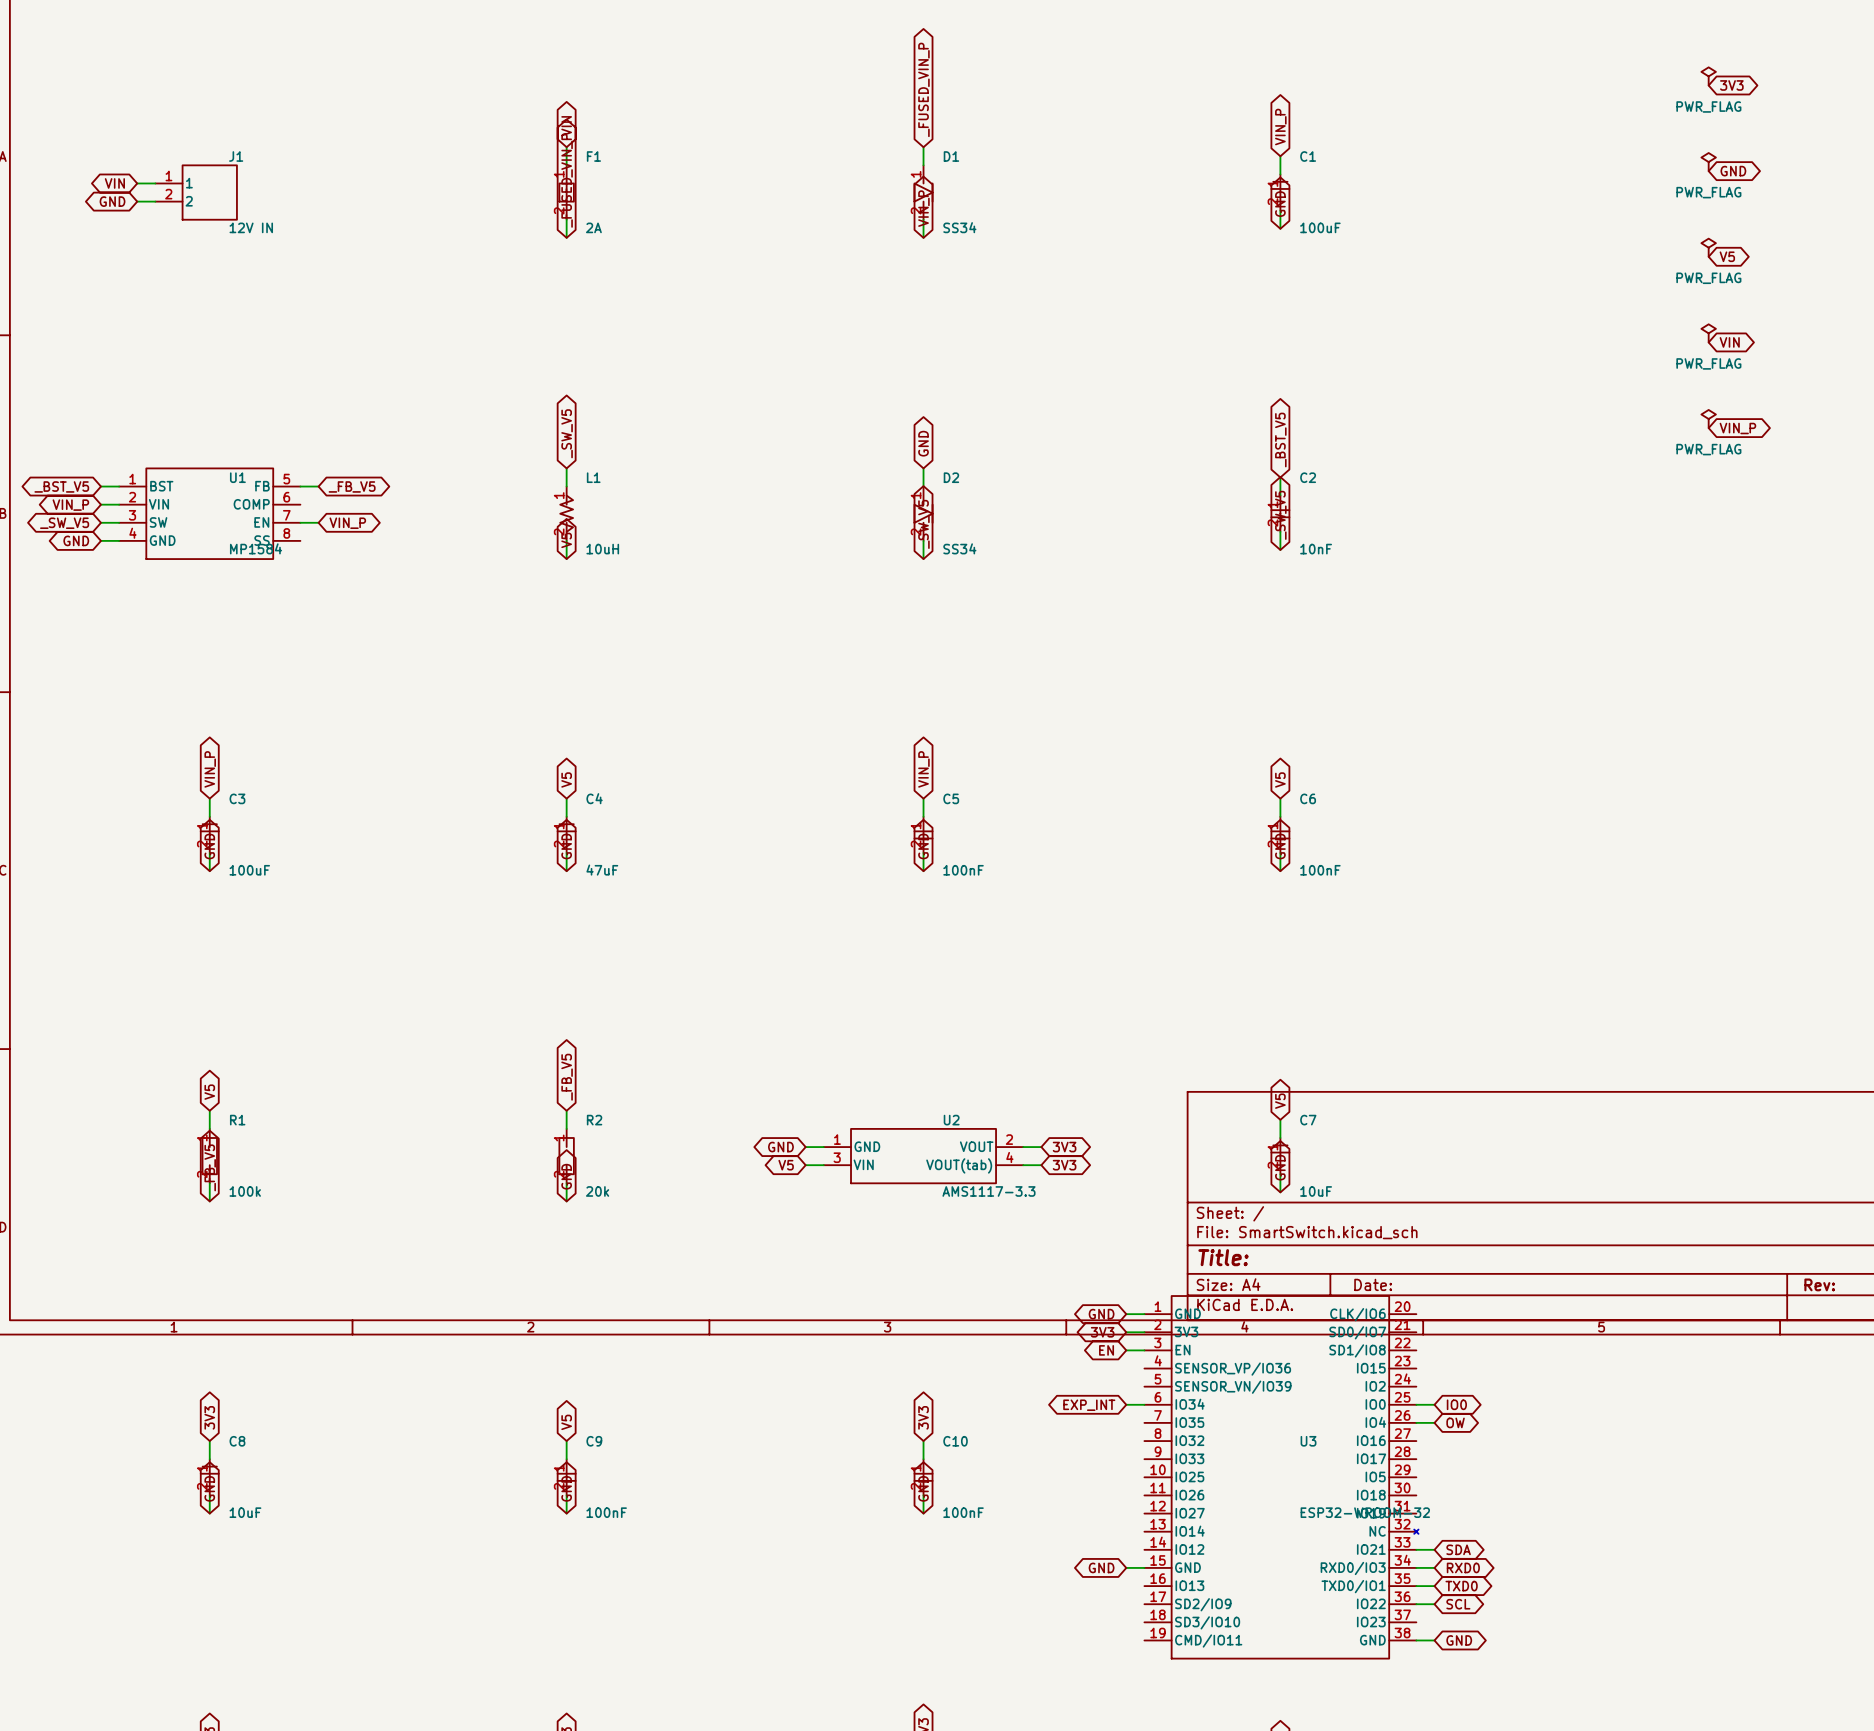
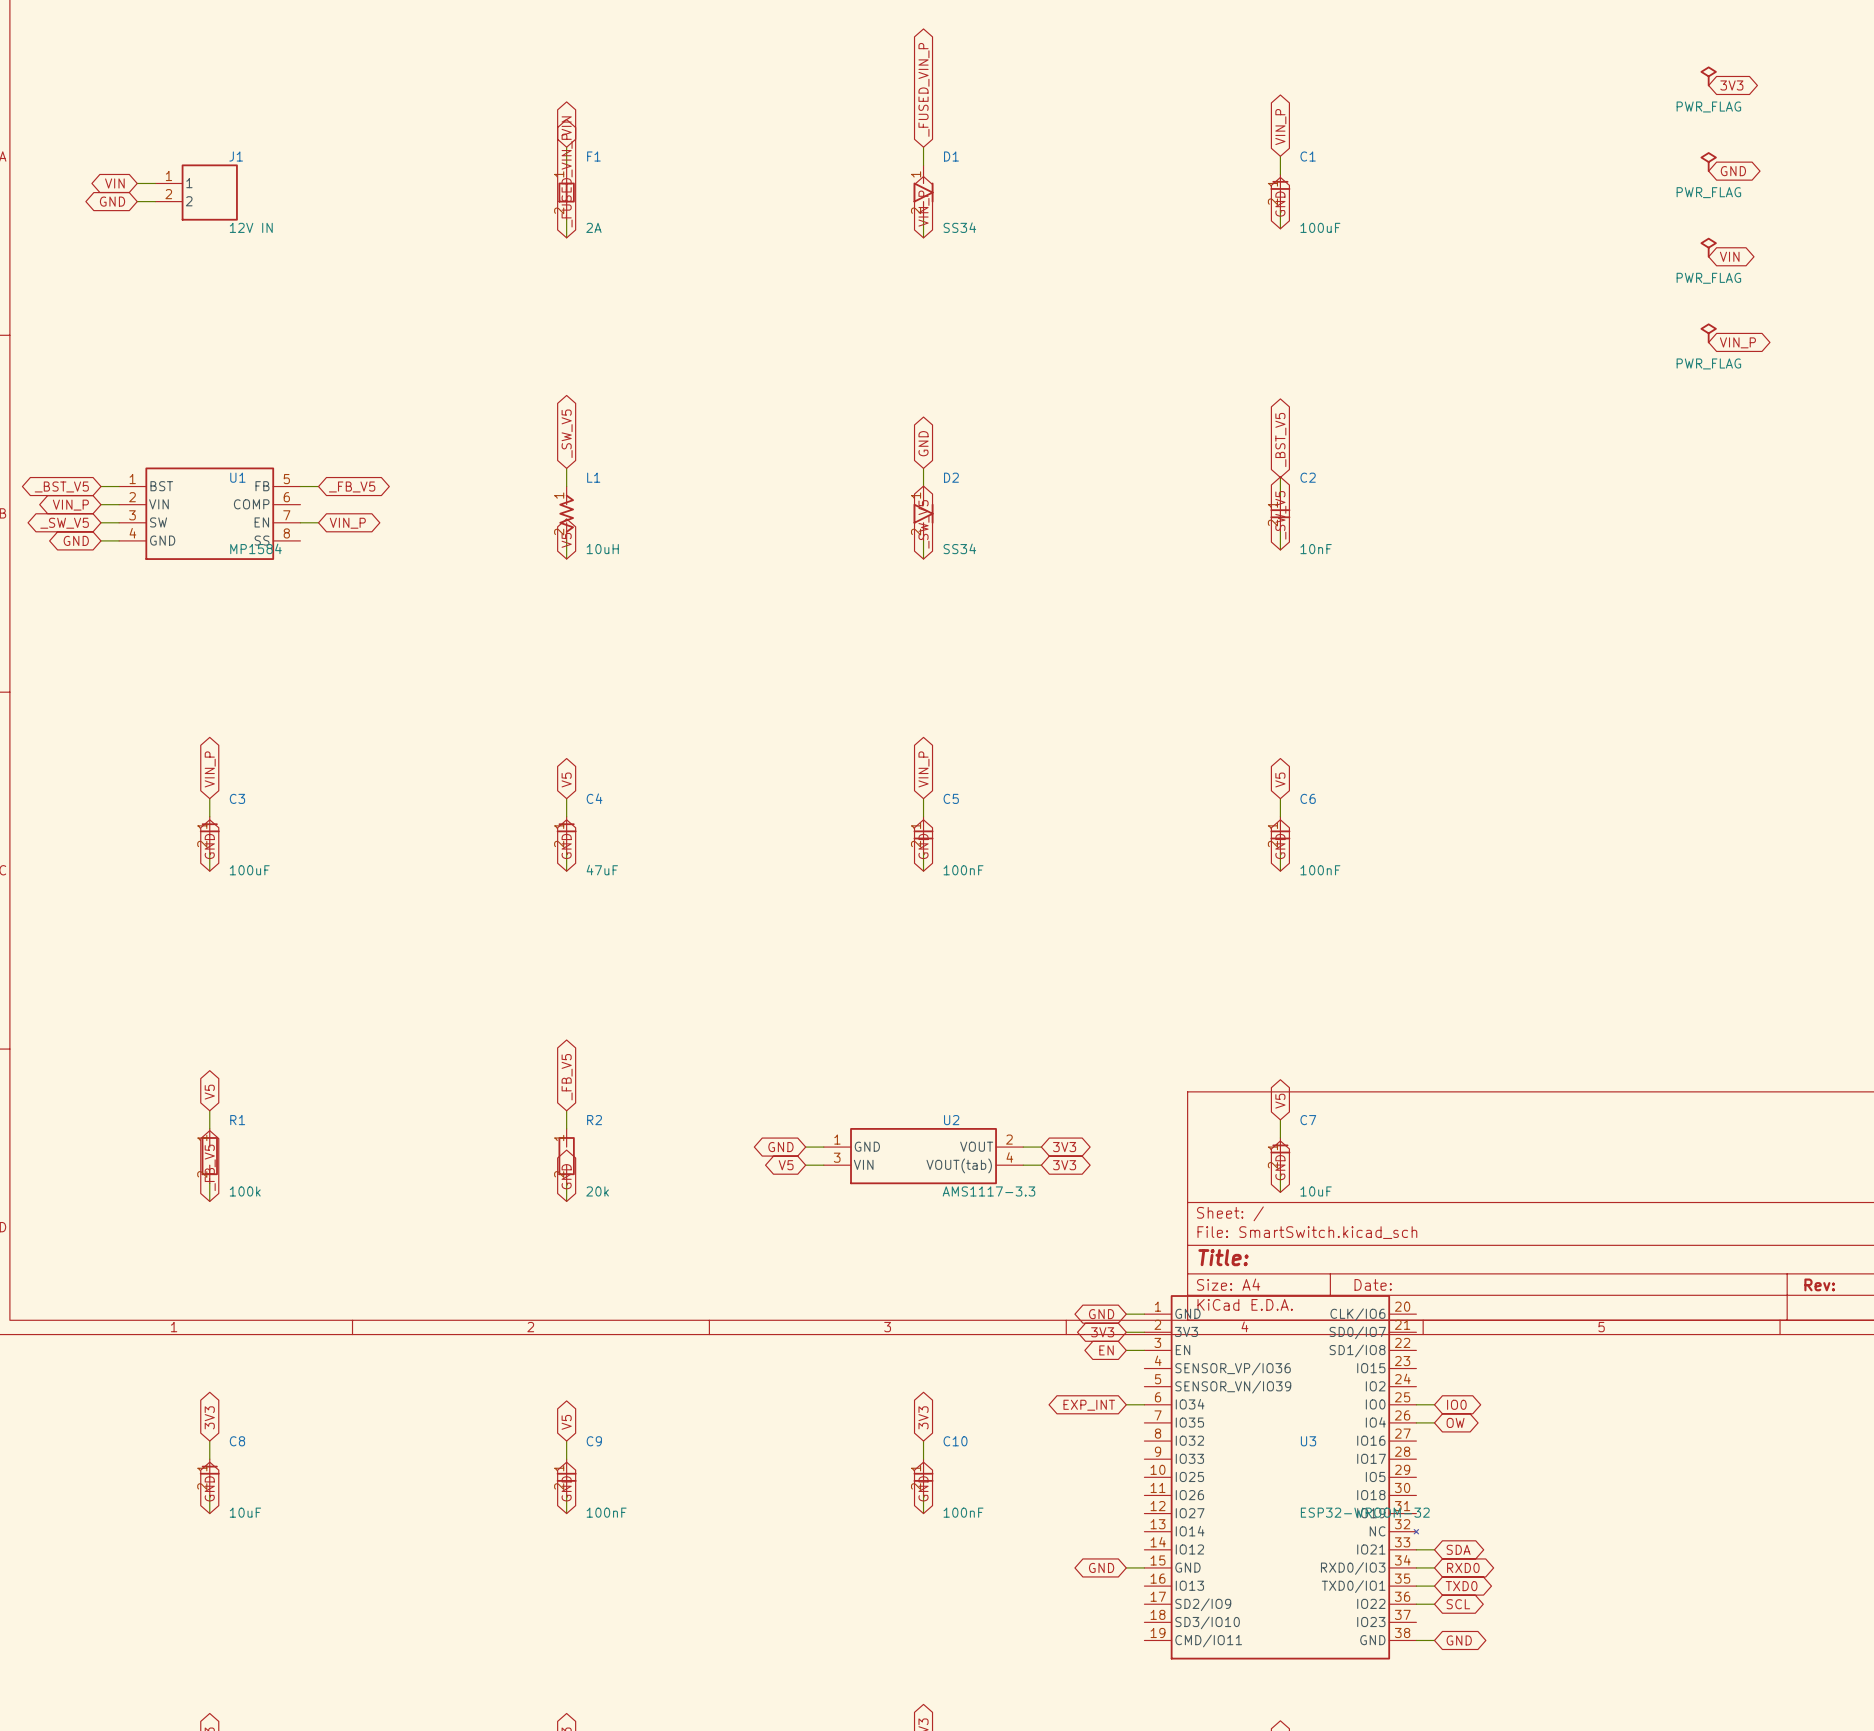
global label: V5 (1727, 256) -> VIN (1729, 256)
global label: VIN (1729, 342) -> VIN_P (1737, 342)
power symbol: PWR_FLAG (1708, 419) -> none
global label: VIN_P (1737, 428) -> none

